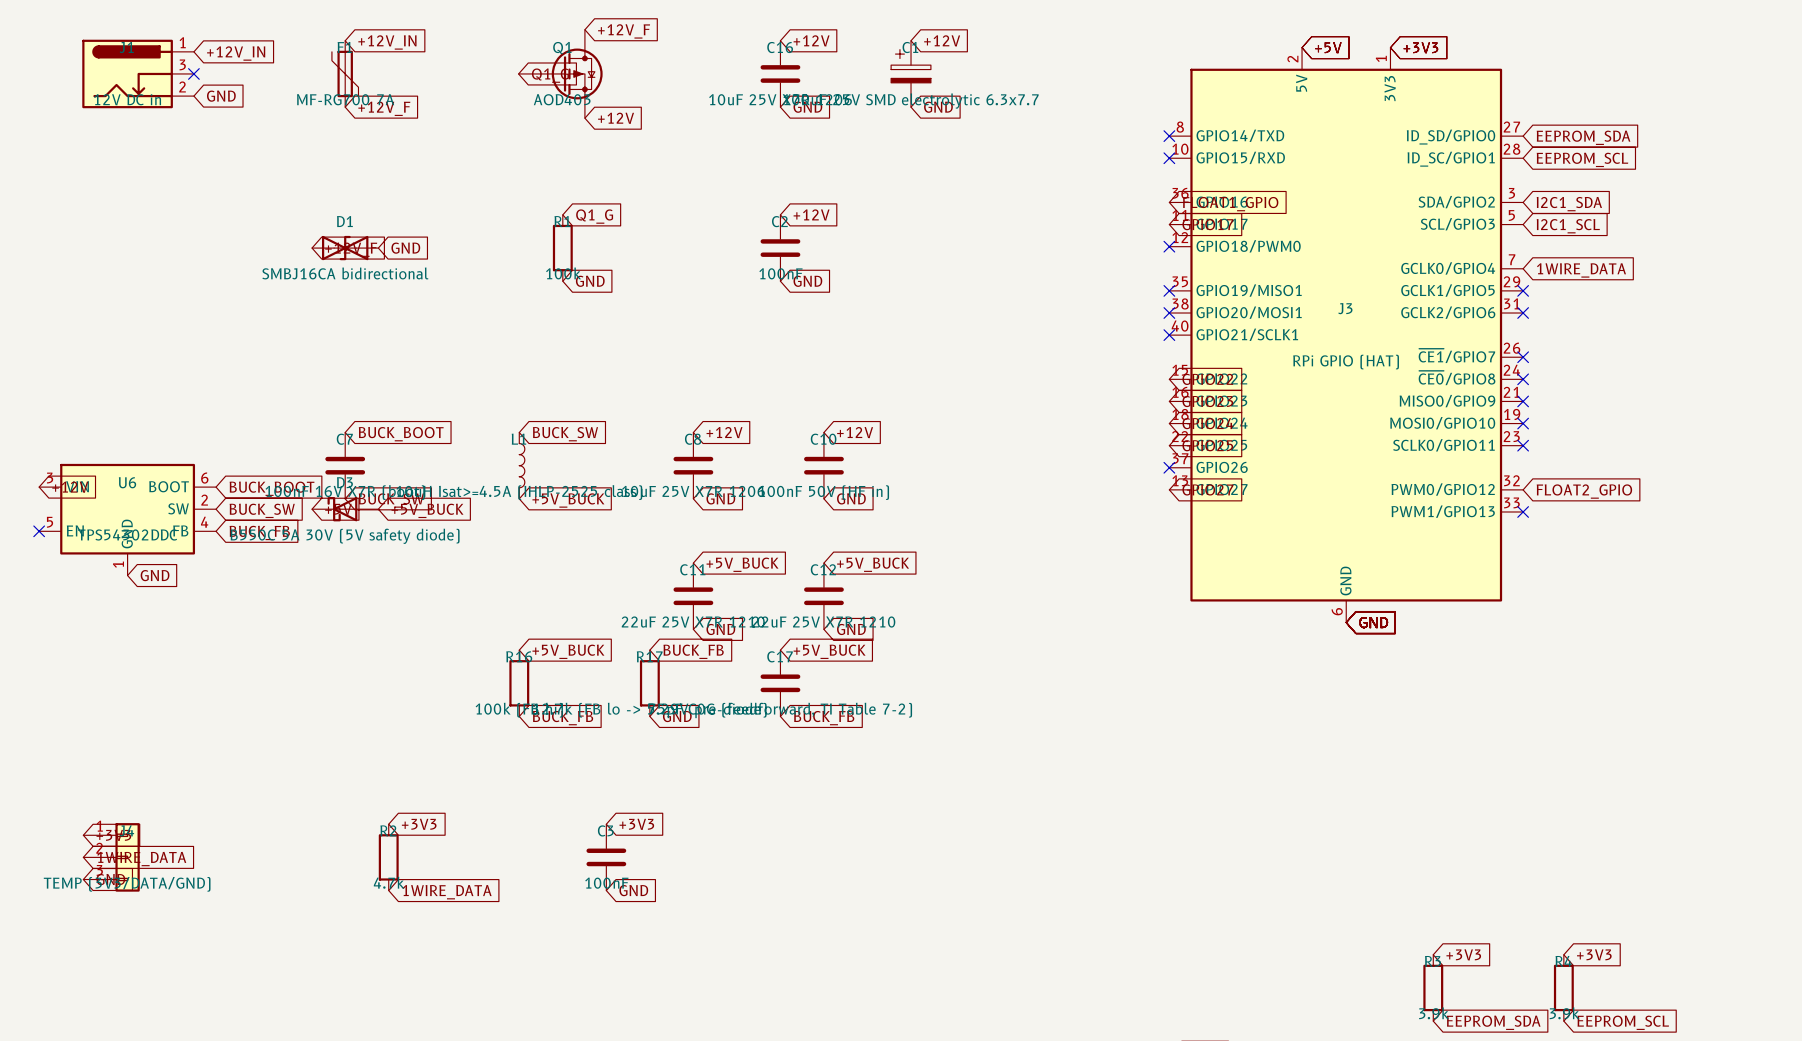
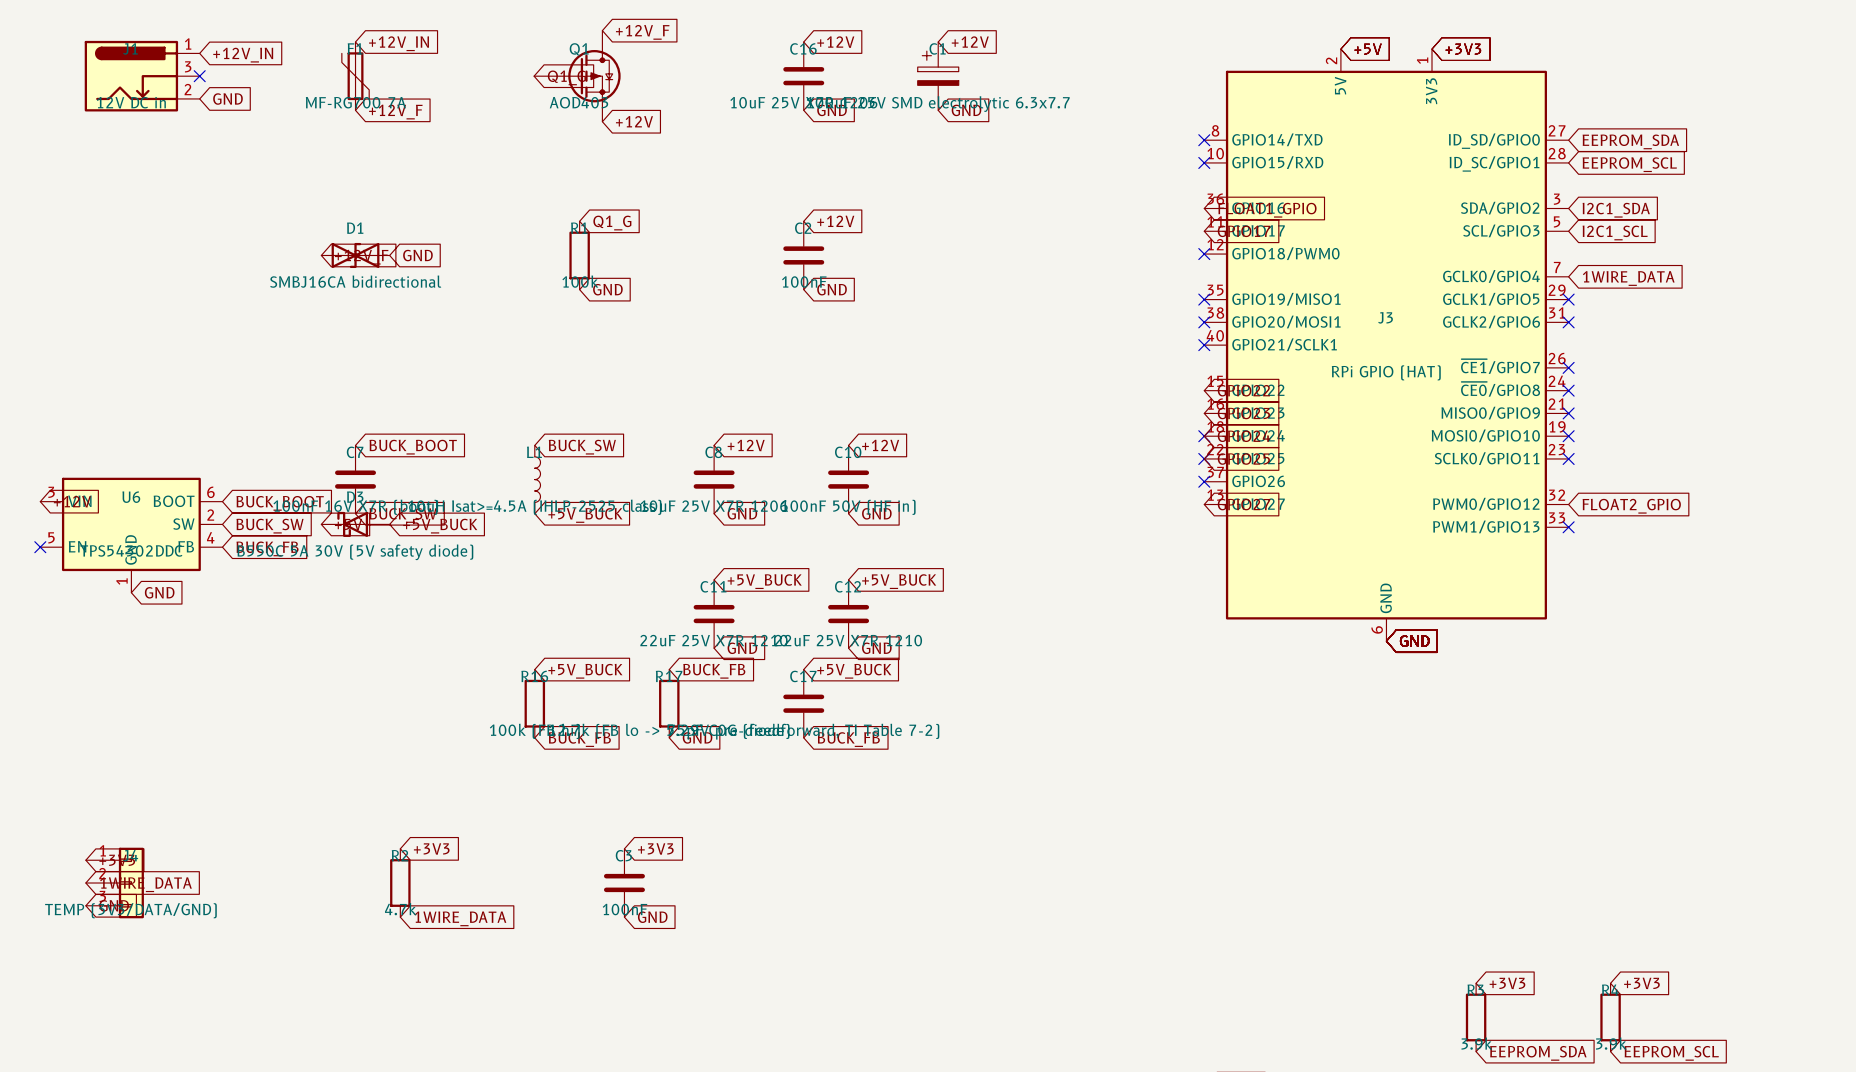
no-connect mark: none -> (1204, 436)
no-connect mark: none -> (1204, 458)

